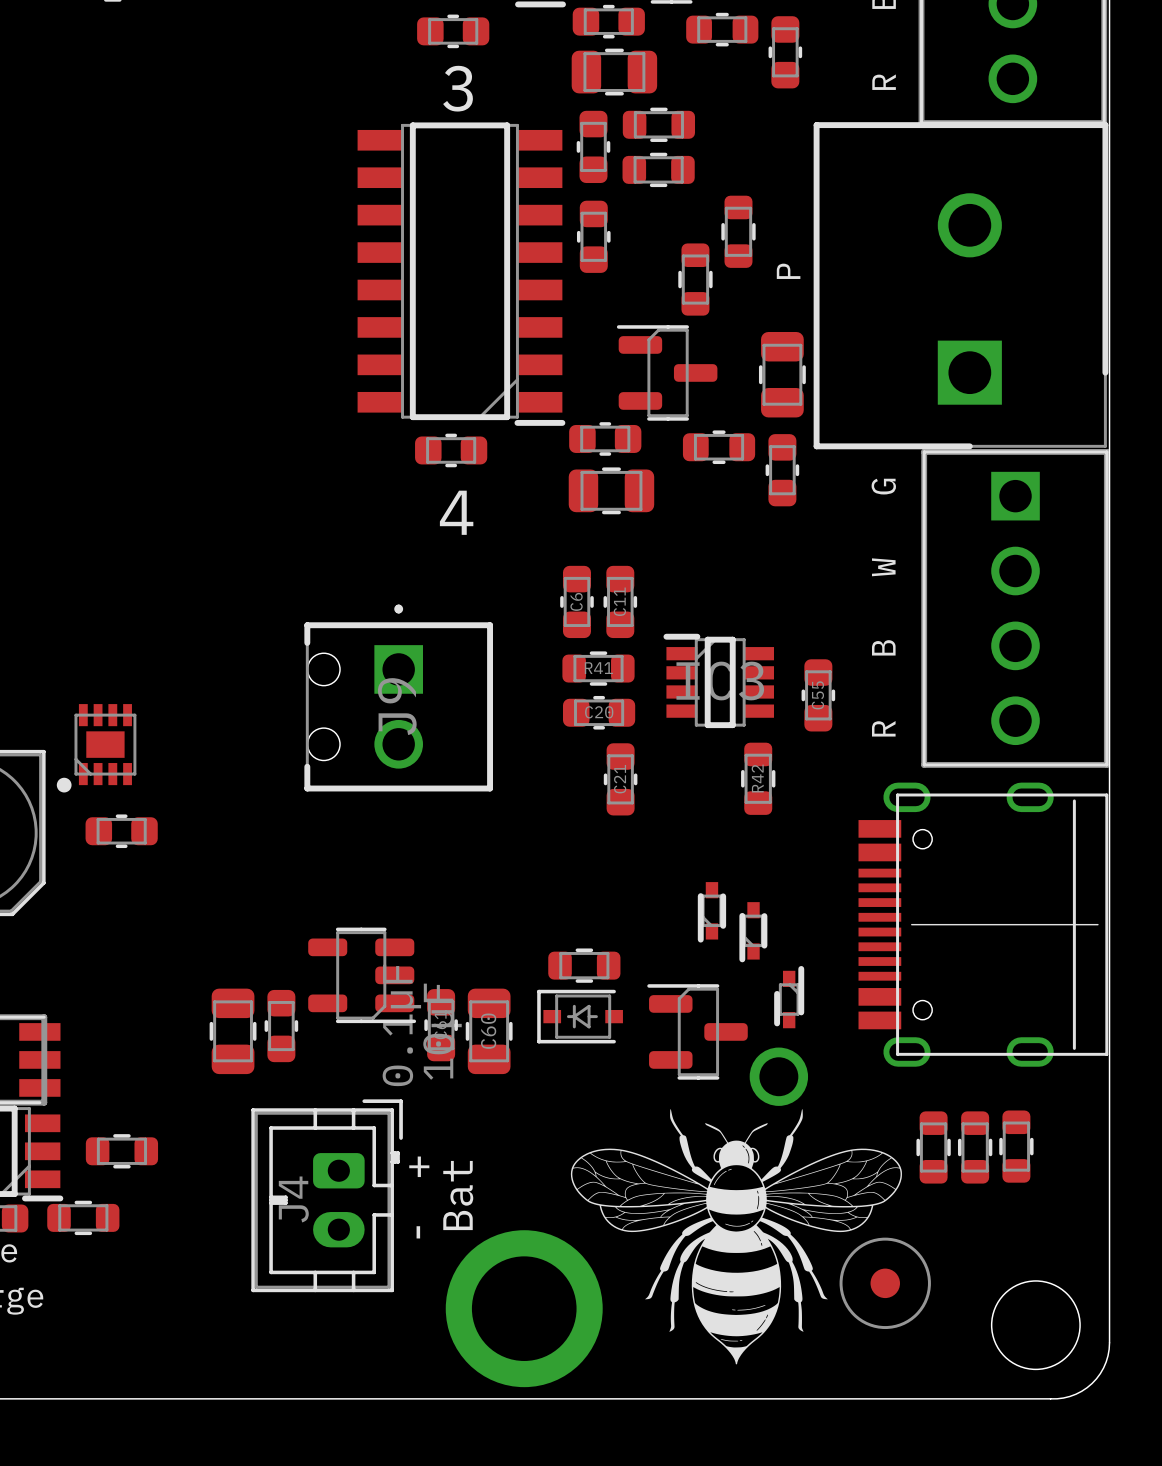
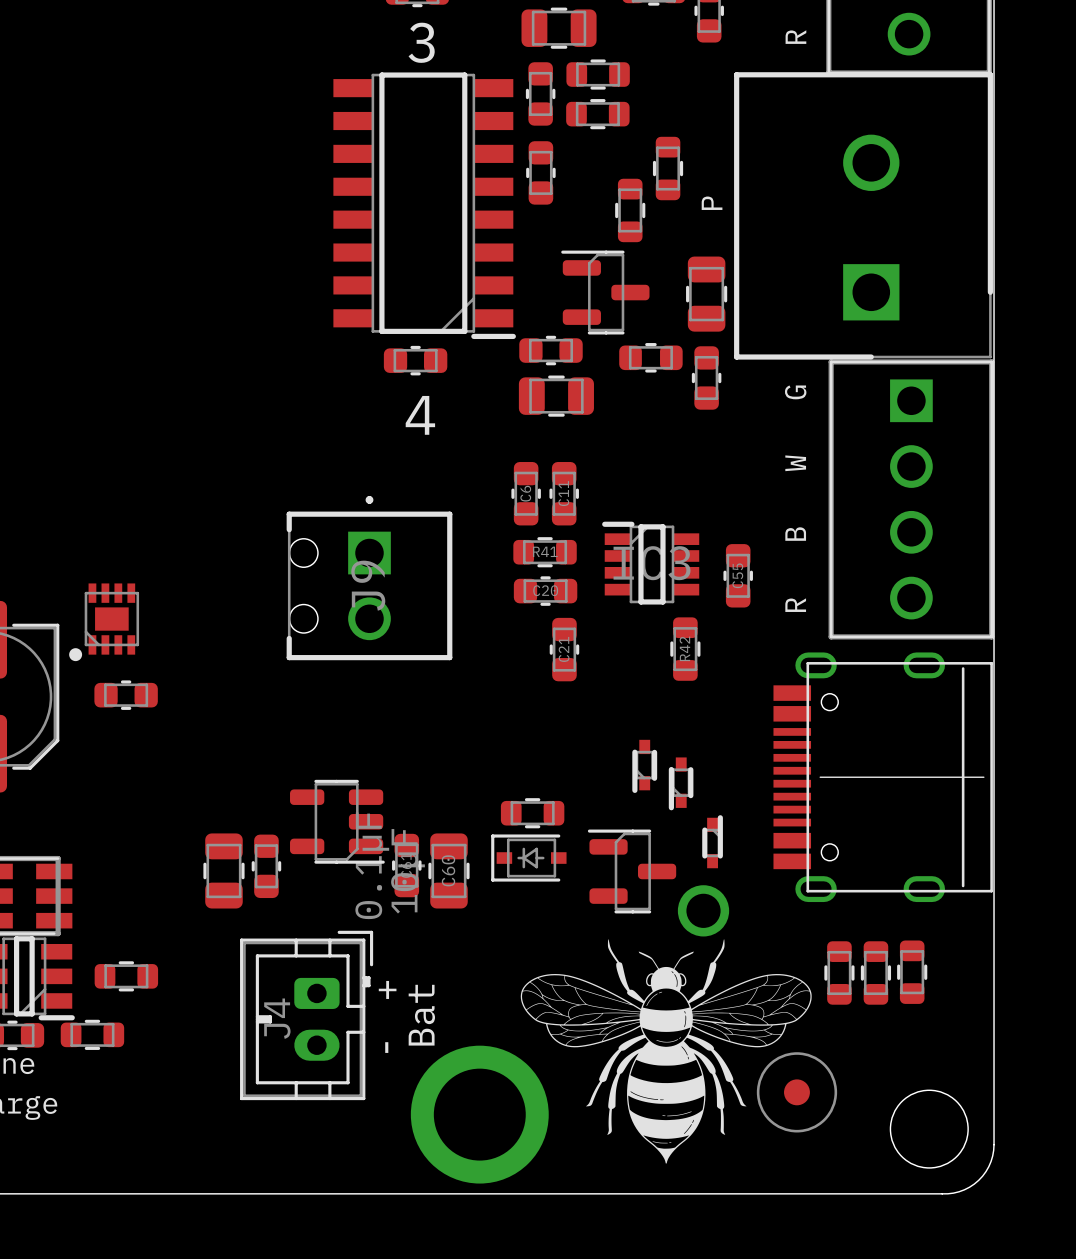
part footprint: [774, 966, 805, 1029] -> [702, 815, 723, 869]

